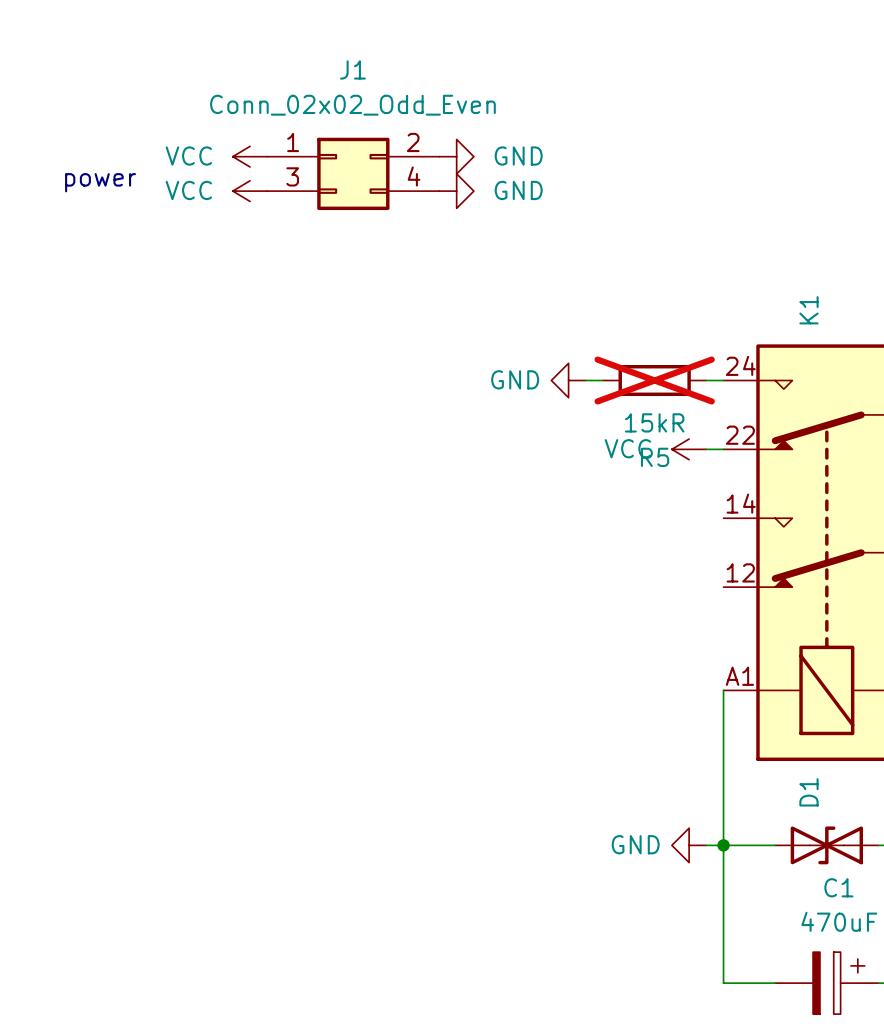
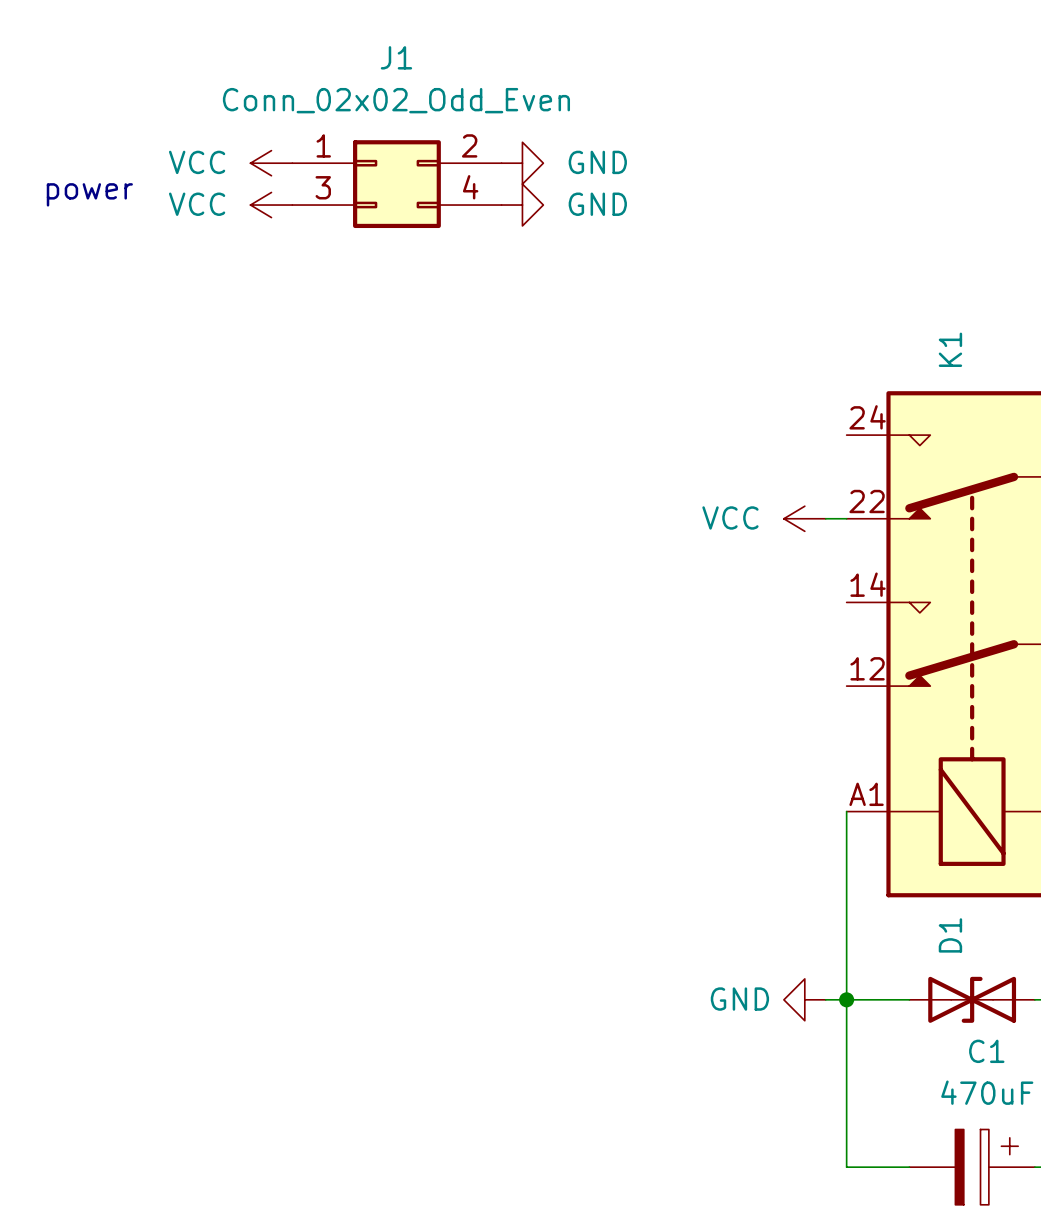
power symbol: GND (568, 380) -> none
wire: (585, 380) (603, 380) -> none
R5: 15kR (654, 380) -> none
wire: (706, 380) (723, 380) -> none

